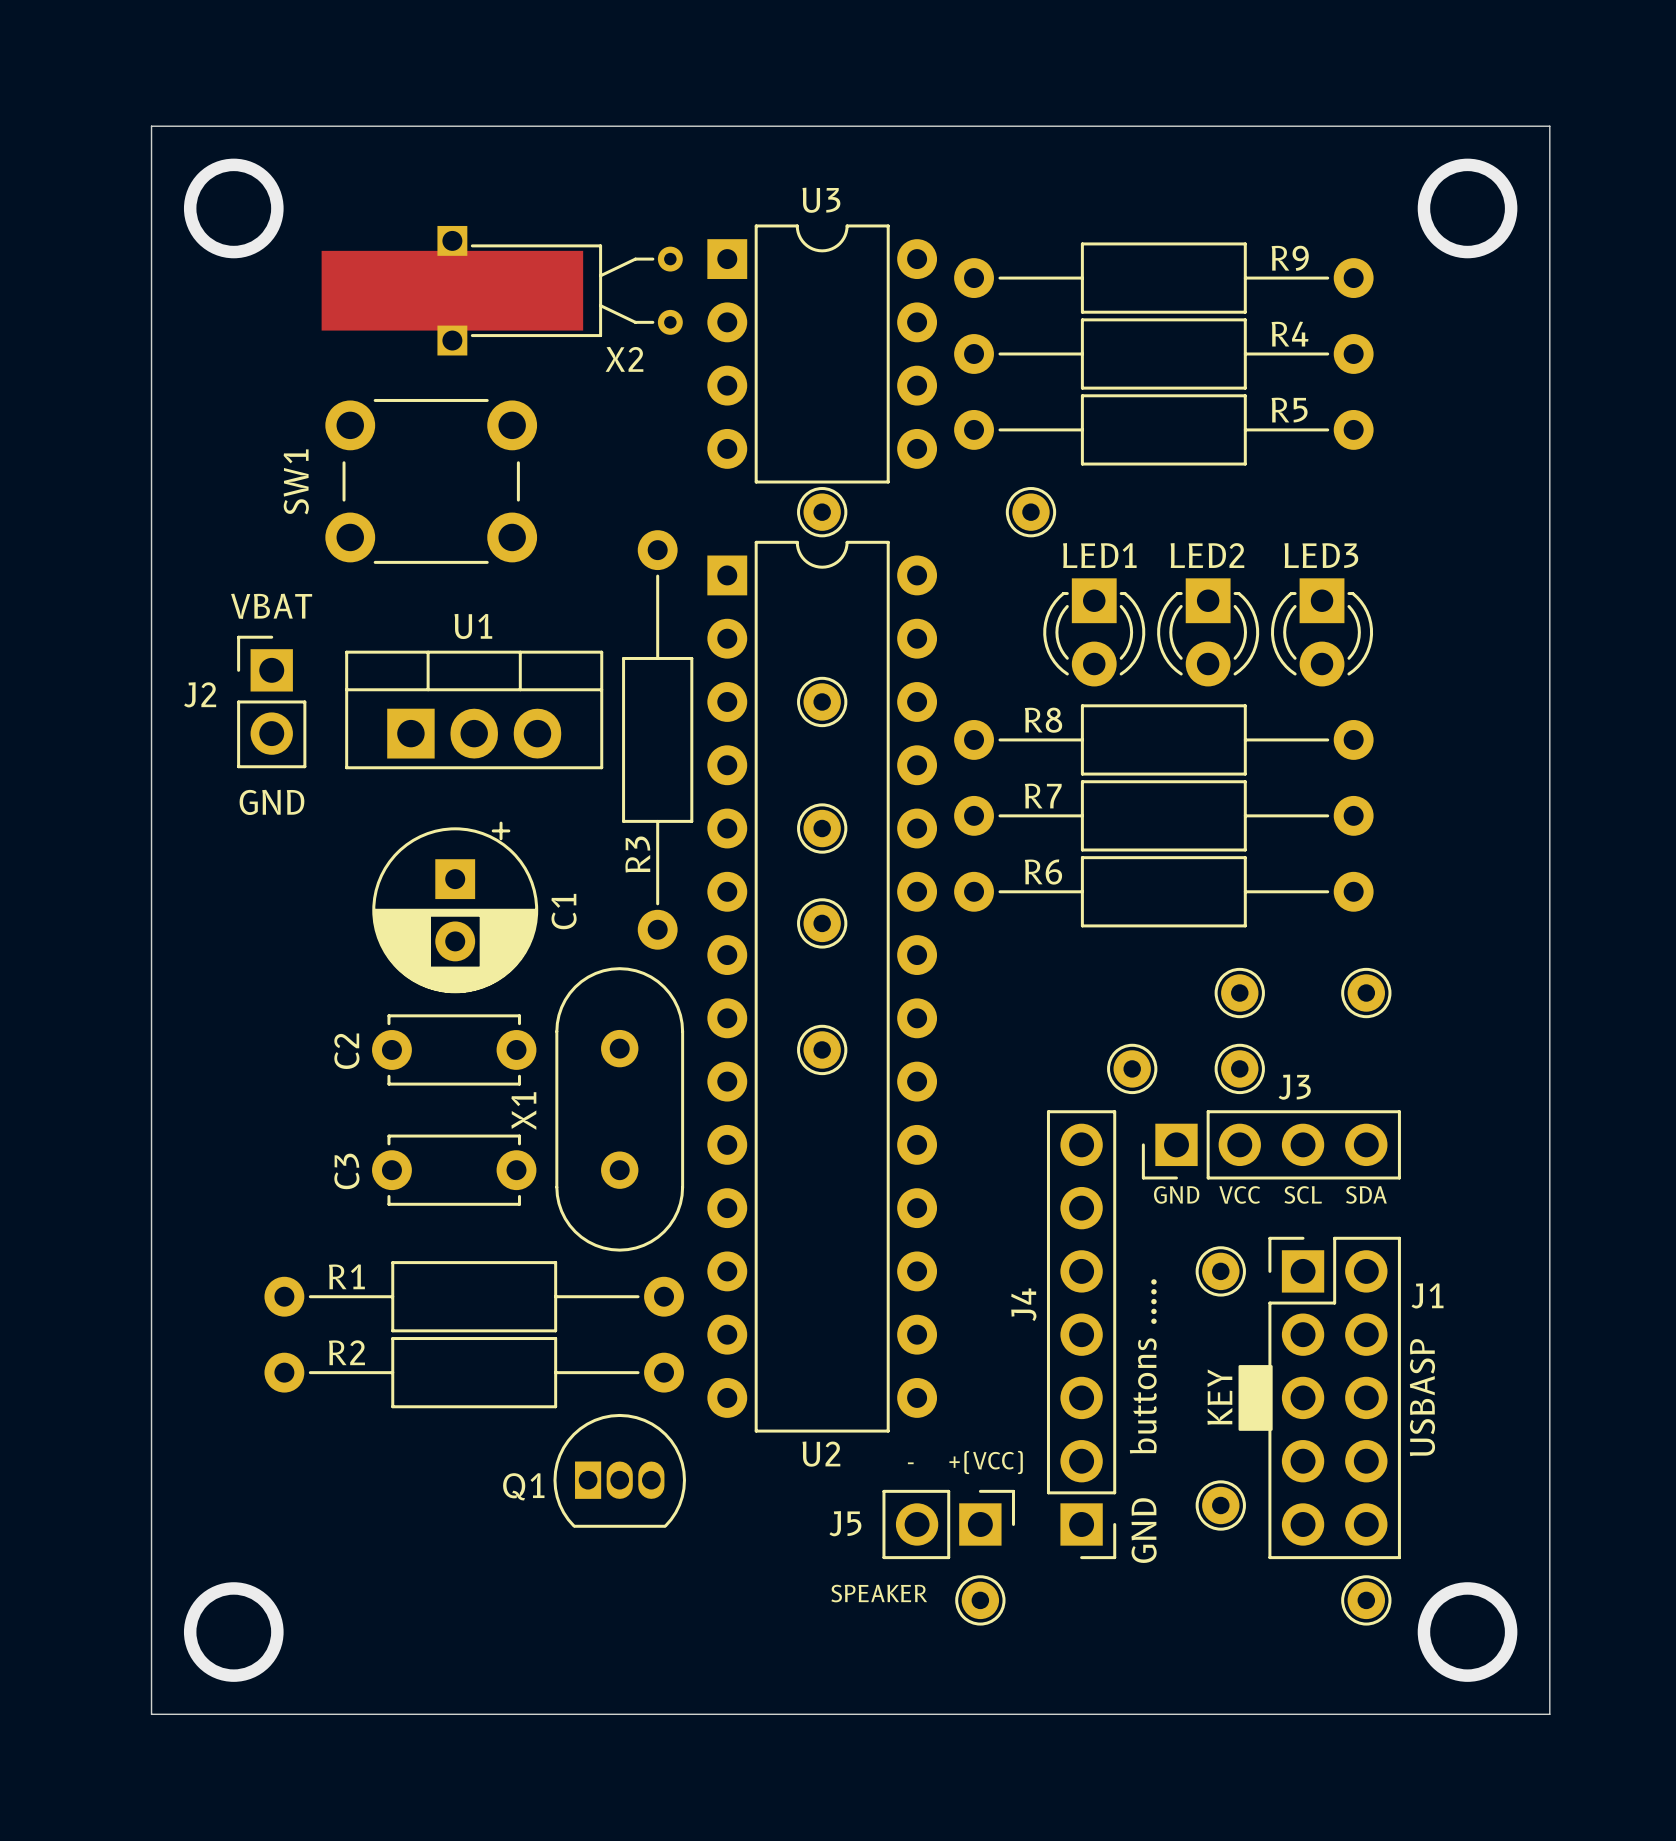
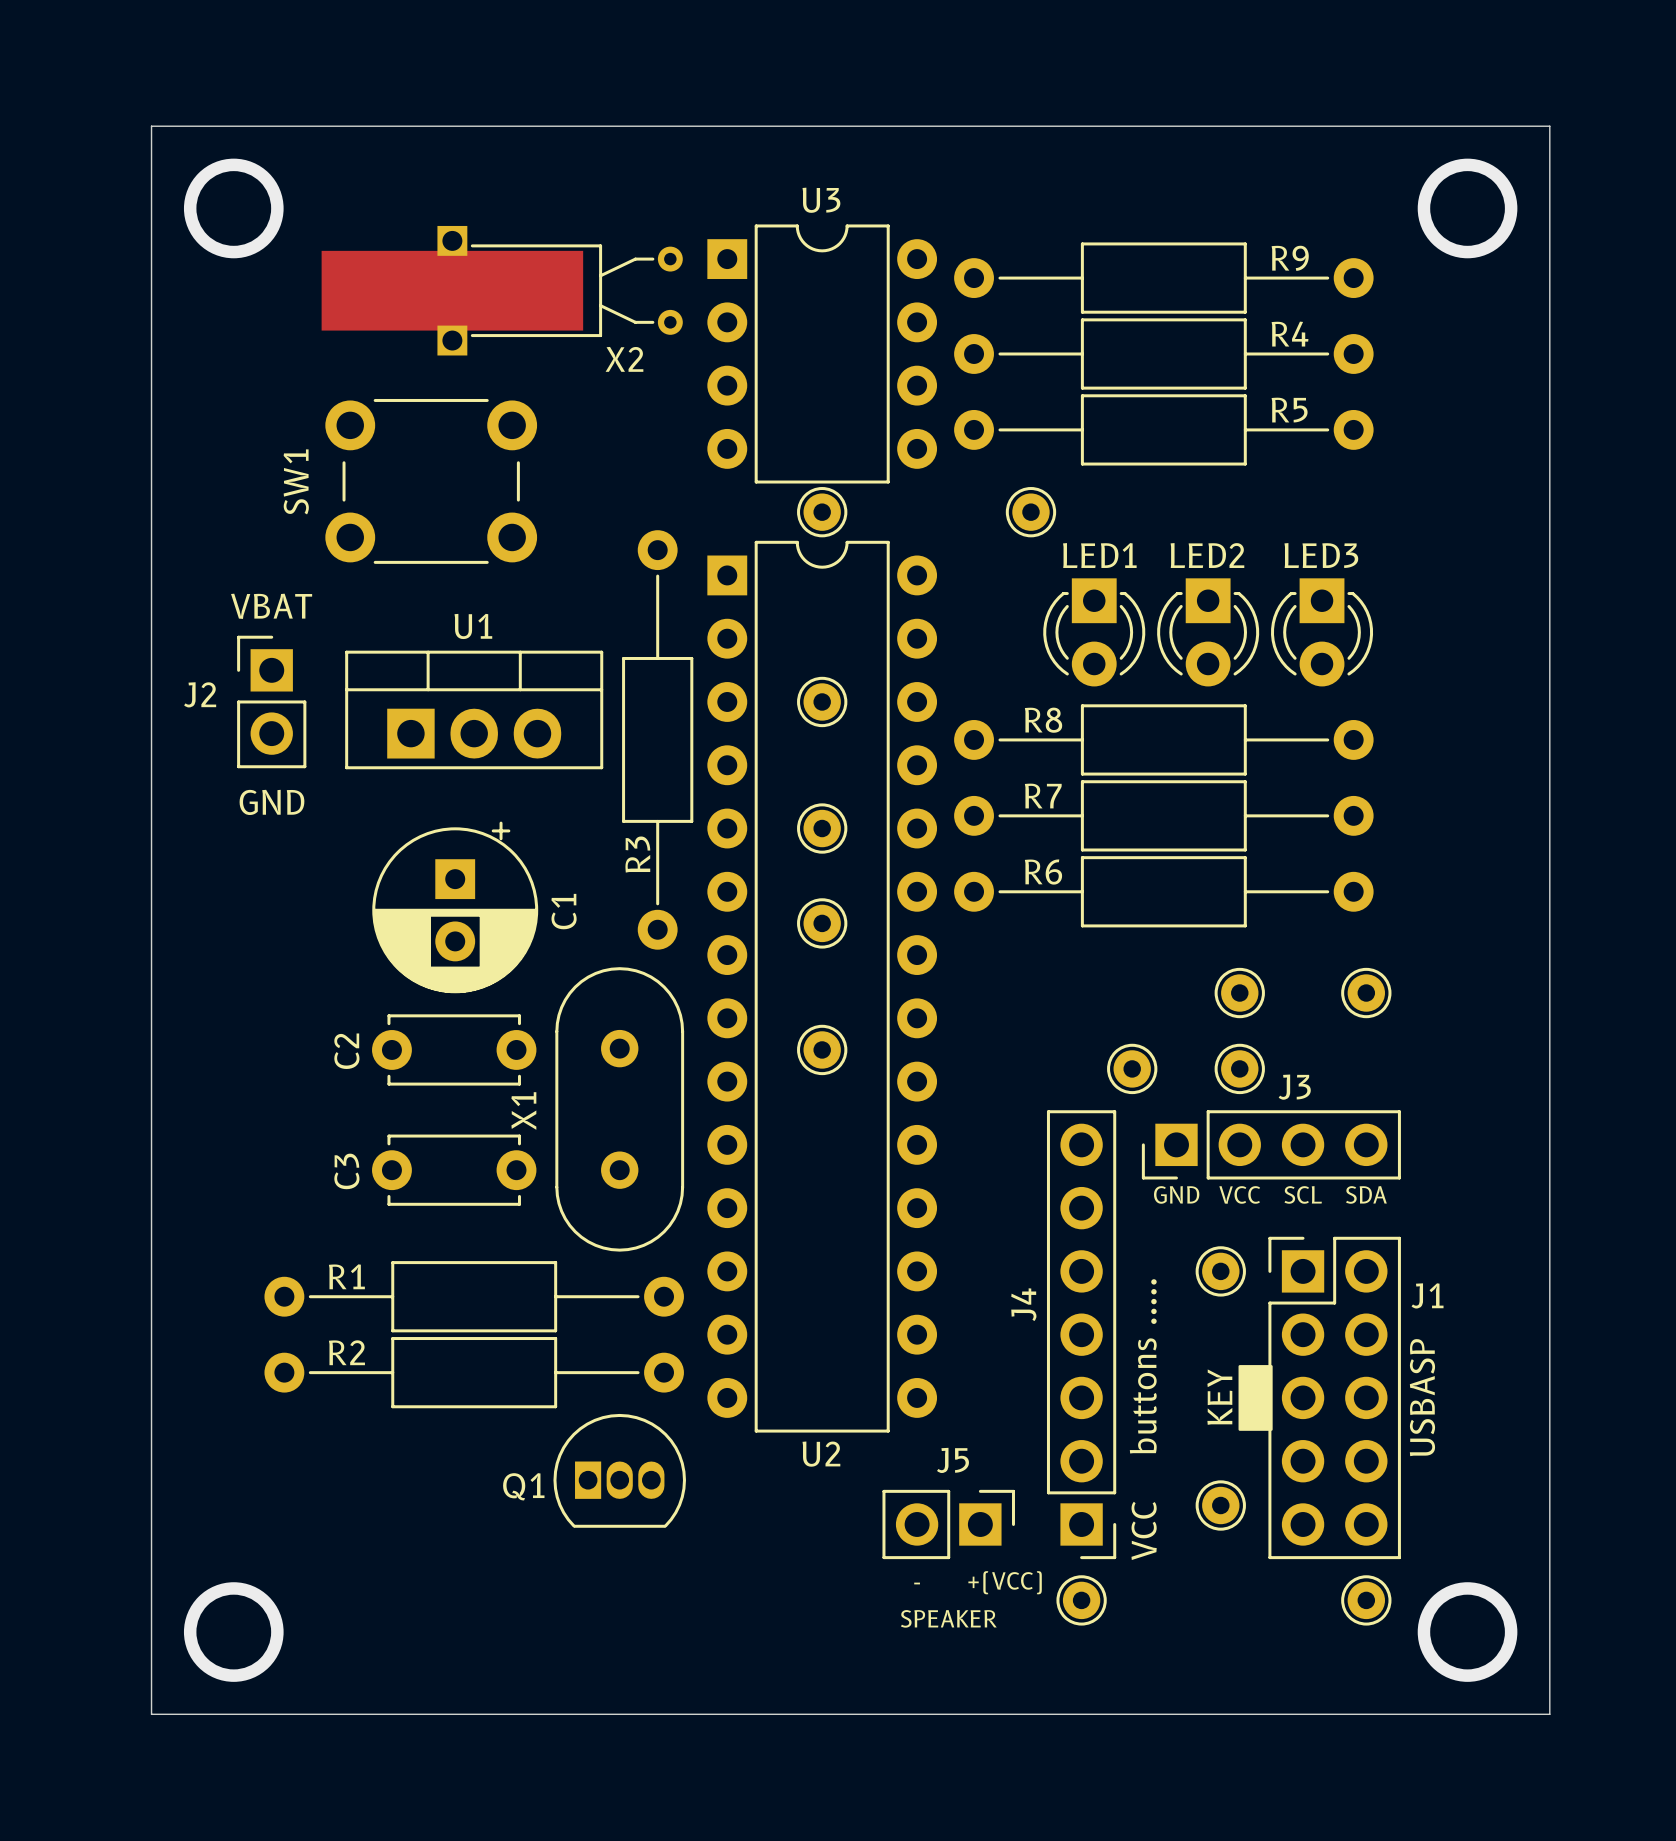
text position: +(VCC) (986, 1462) -> +(VCC) (1005, 1582)
text position: - (910, 1463) -> - (917, 1583)
J5 name position: J5 (845, 1523) -> J5 (953, 1460)
text: GND (1144, 1530) -> VCC (1144, 1530)
text position: SPEAKER (879, 1593) -> SPEAKER (948, 1618)
part position: (980, 1600) -> (1081, 1600)

